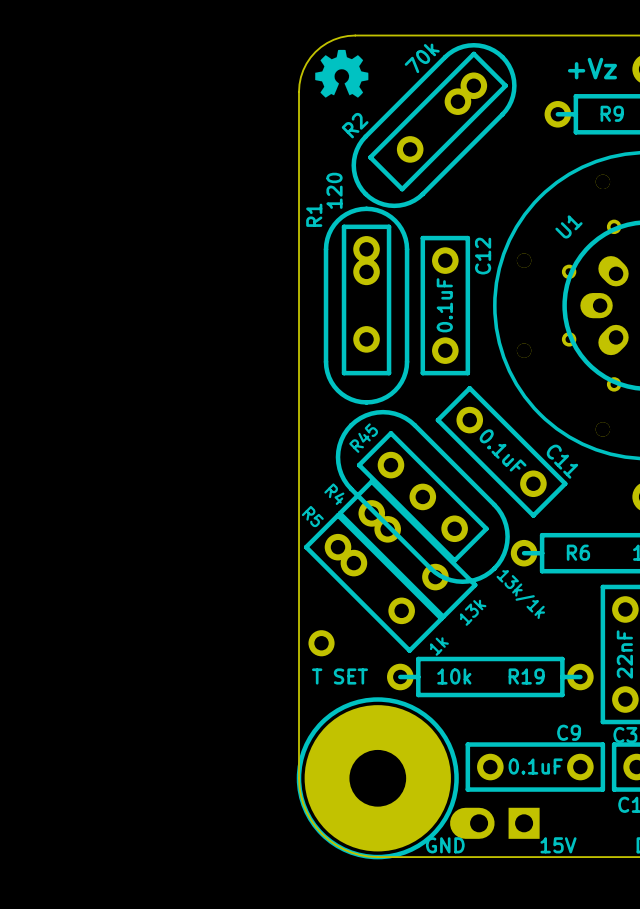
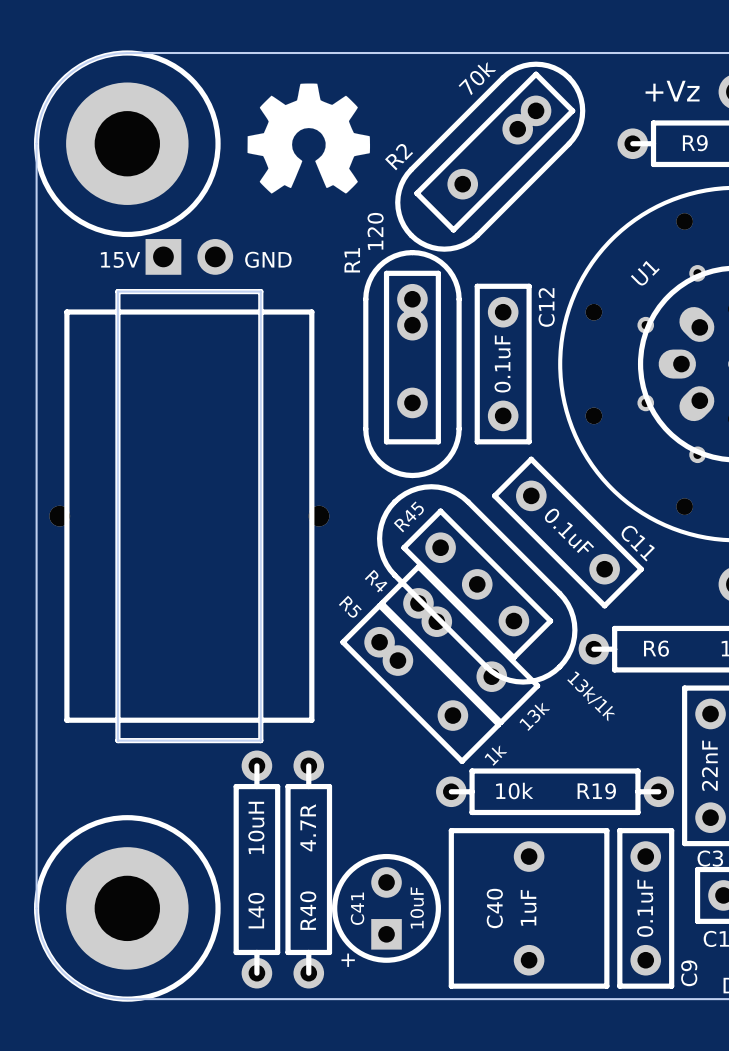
board edge: (355, 35) (333, 39) (315, 51) (303, 70) (299, 84) (299, 778) (300, 795) (306, 812) (322, 834) (343, 849) (360, 855) (377, 857) -> (399, 53) (117, 53) (87, 61) (70, 72) (56, 87) (45, 104) (38, 123) (36, 143) (36, 908) (41, 938) (56, 964) (79, 985) (107, 996) (127, 999) (425, 999)
drawing: [315, 49, 369, 98] -> none
drawing: none -> [247, 83, 371, 194]
part: none -> (127, 143)
text: none -> 15V (120, 259)
text: none -> GND (268, 259)
board edge: none -> (117, 291) (117, 740) (260, 740) (260, 291) (117, 291)
part: none -> (189, 491)
part: (321, 643) -> none
text: T SET (340, 676) -> none
L40: none -> 10uH (256, 869)
R40: none -> 4.7R (308, 869)
C9 rotation: 0° (535, 767) -> 90° clockwise (645, 908)
part: none -> (127, 908)
C41: none -> 10uF (386, 908)
part: (377, 778) -> none
C40: none -> 1uF (529, 908)
part: (472, 823) -> none
part: (524, 823) -> none
text: GND (445, 845) -> none
text: 15V (558, 845) -> none

